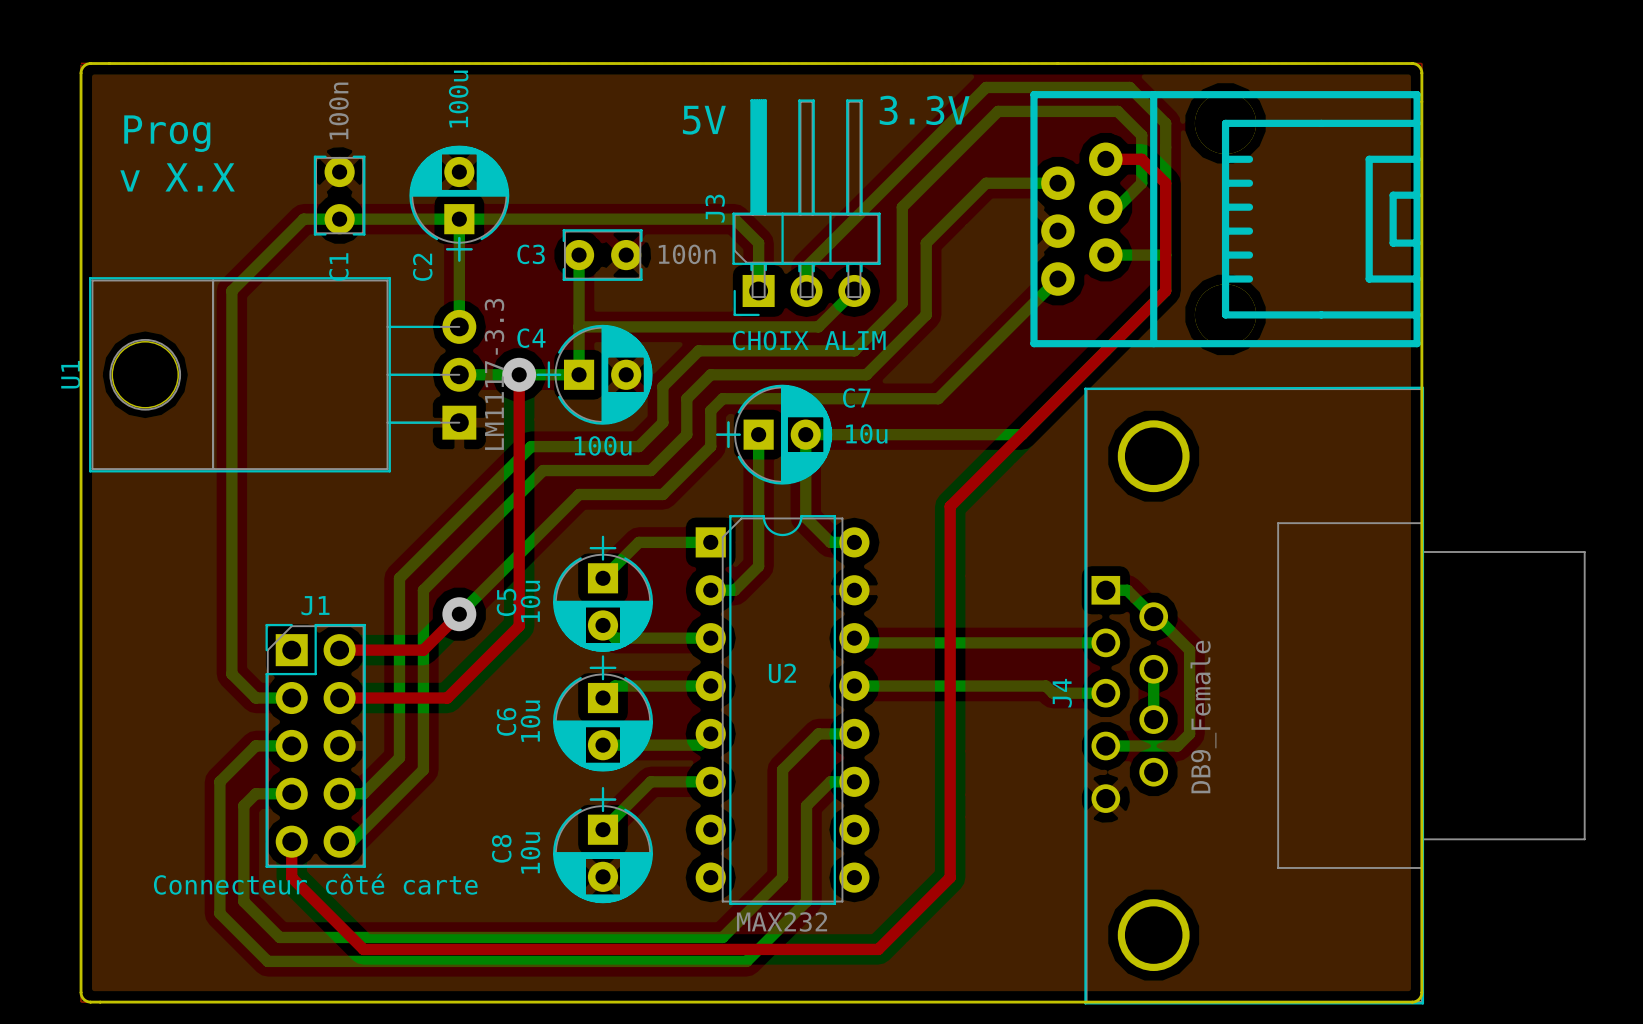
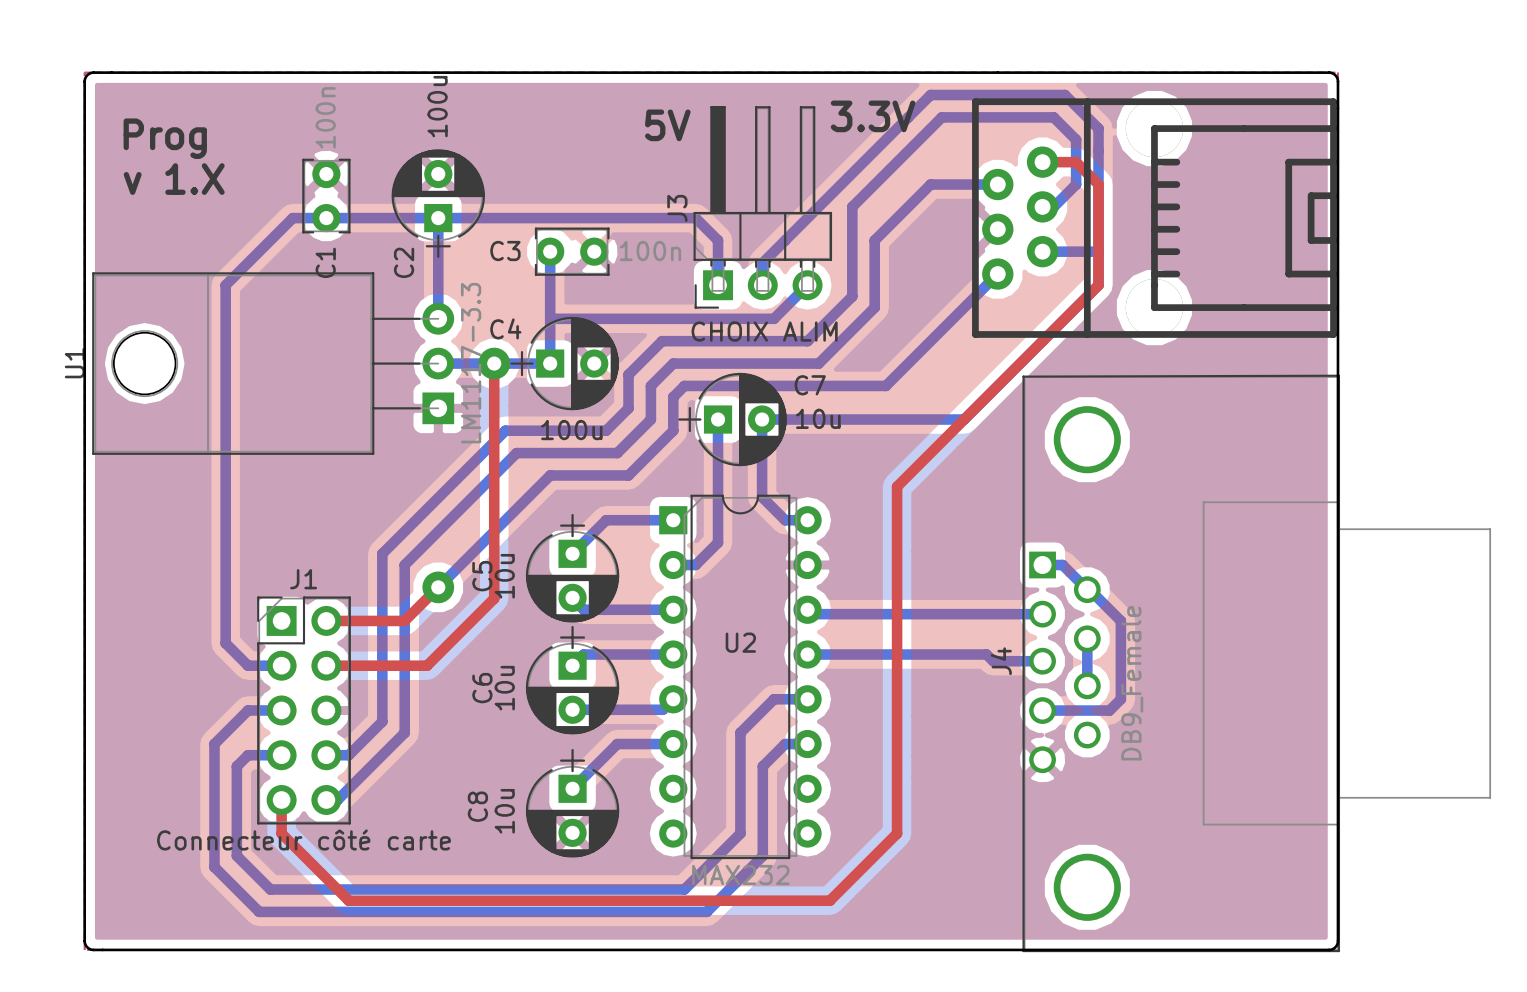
text: v X.X (177, 177) -> v 1.X (174, 179)

